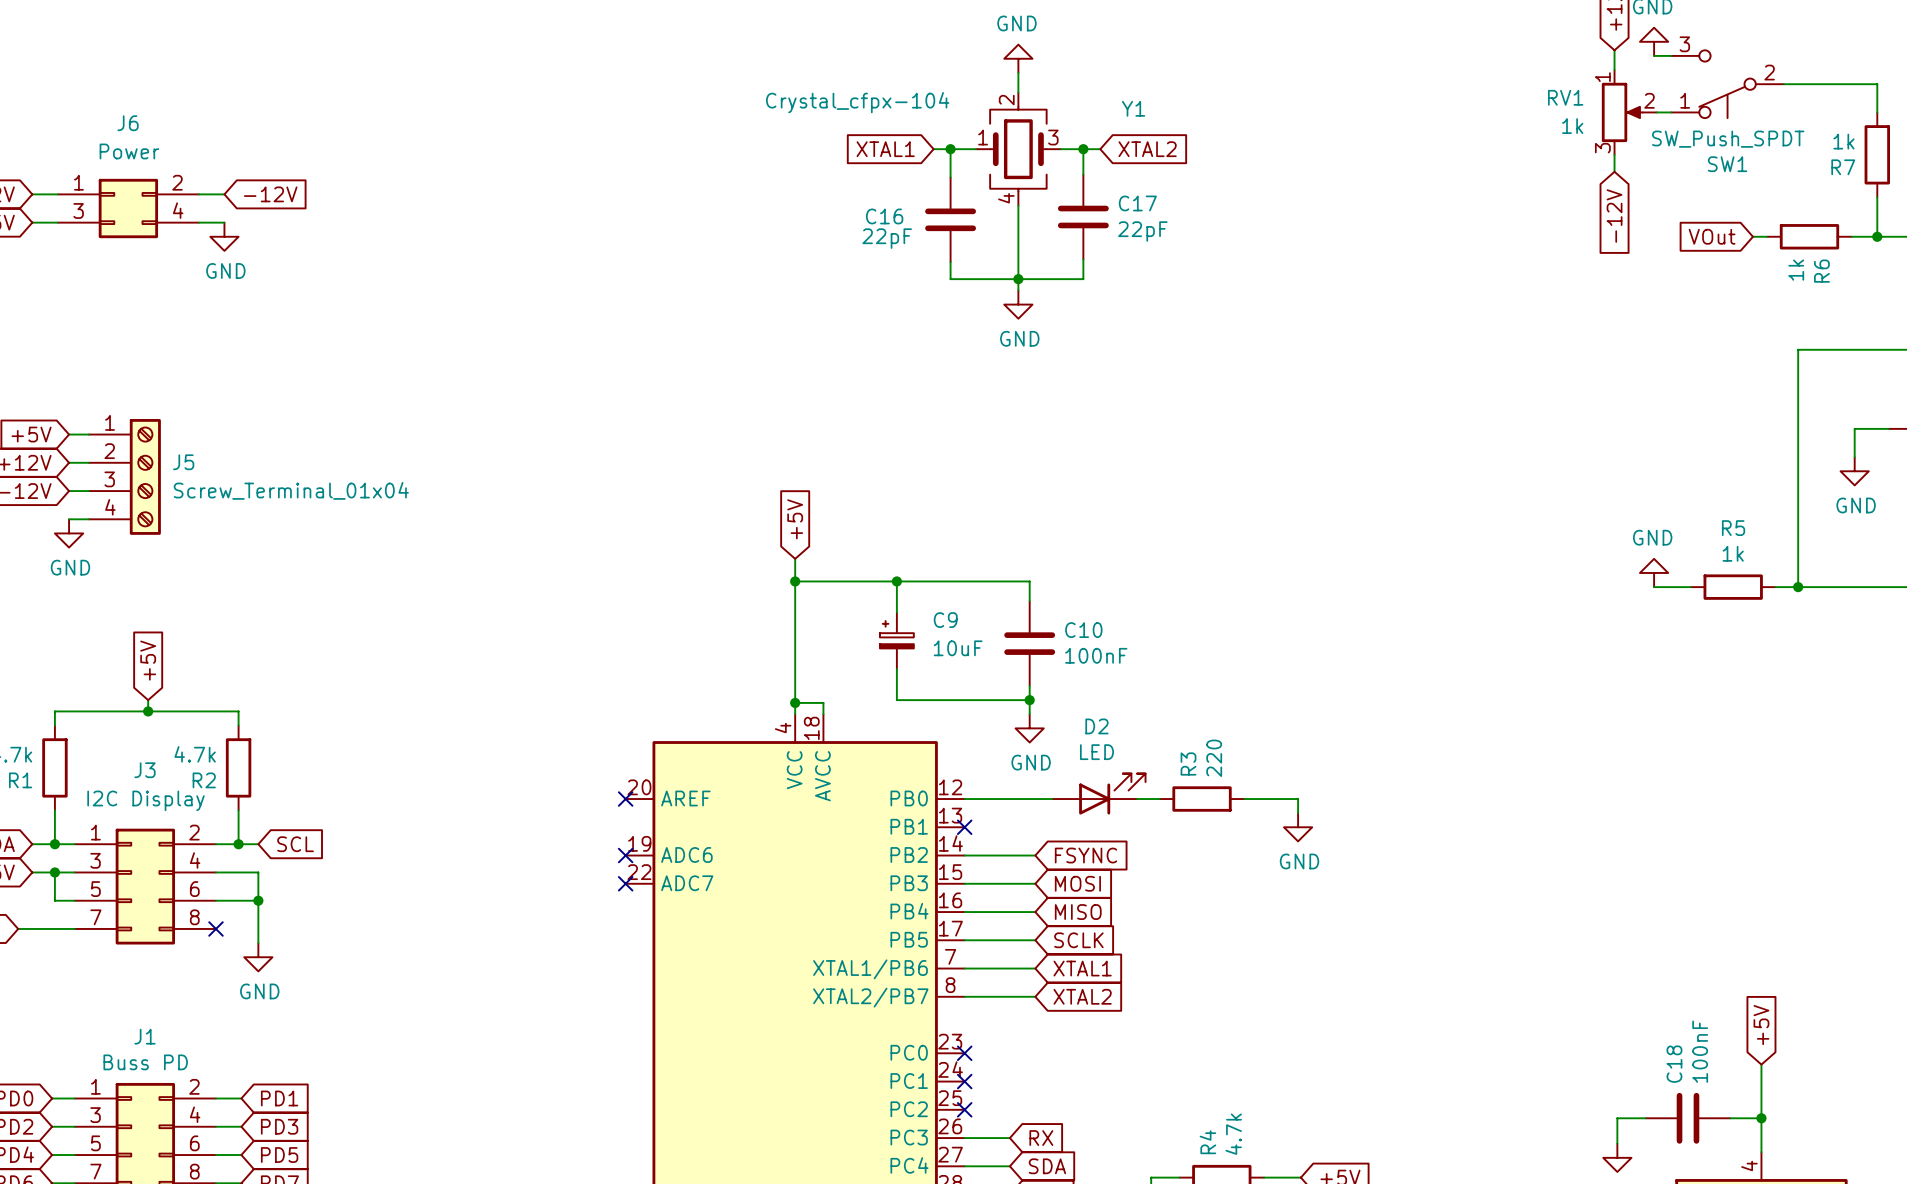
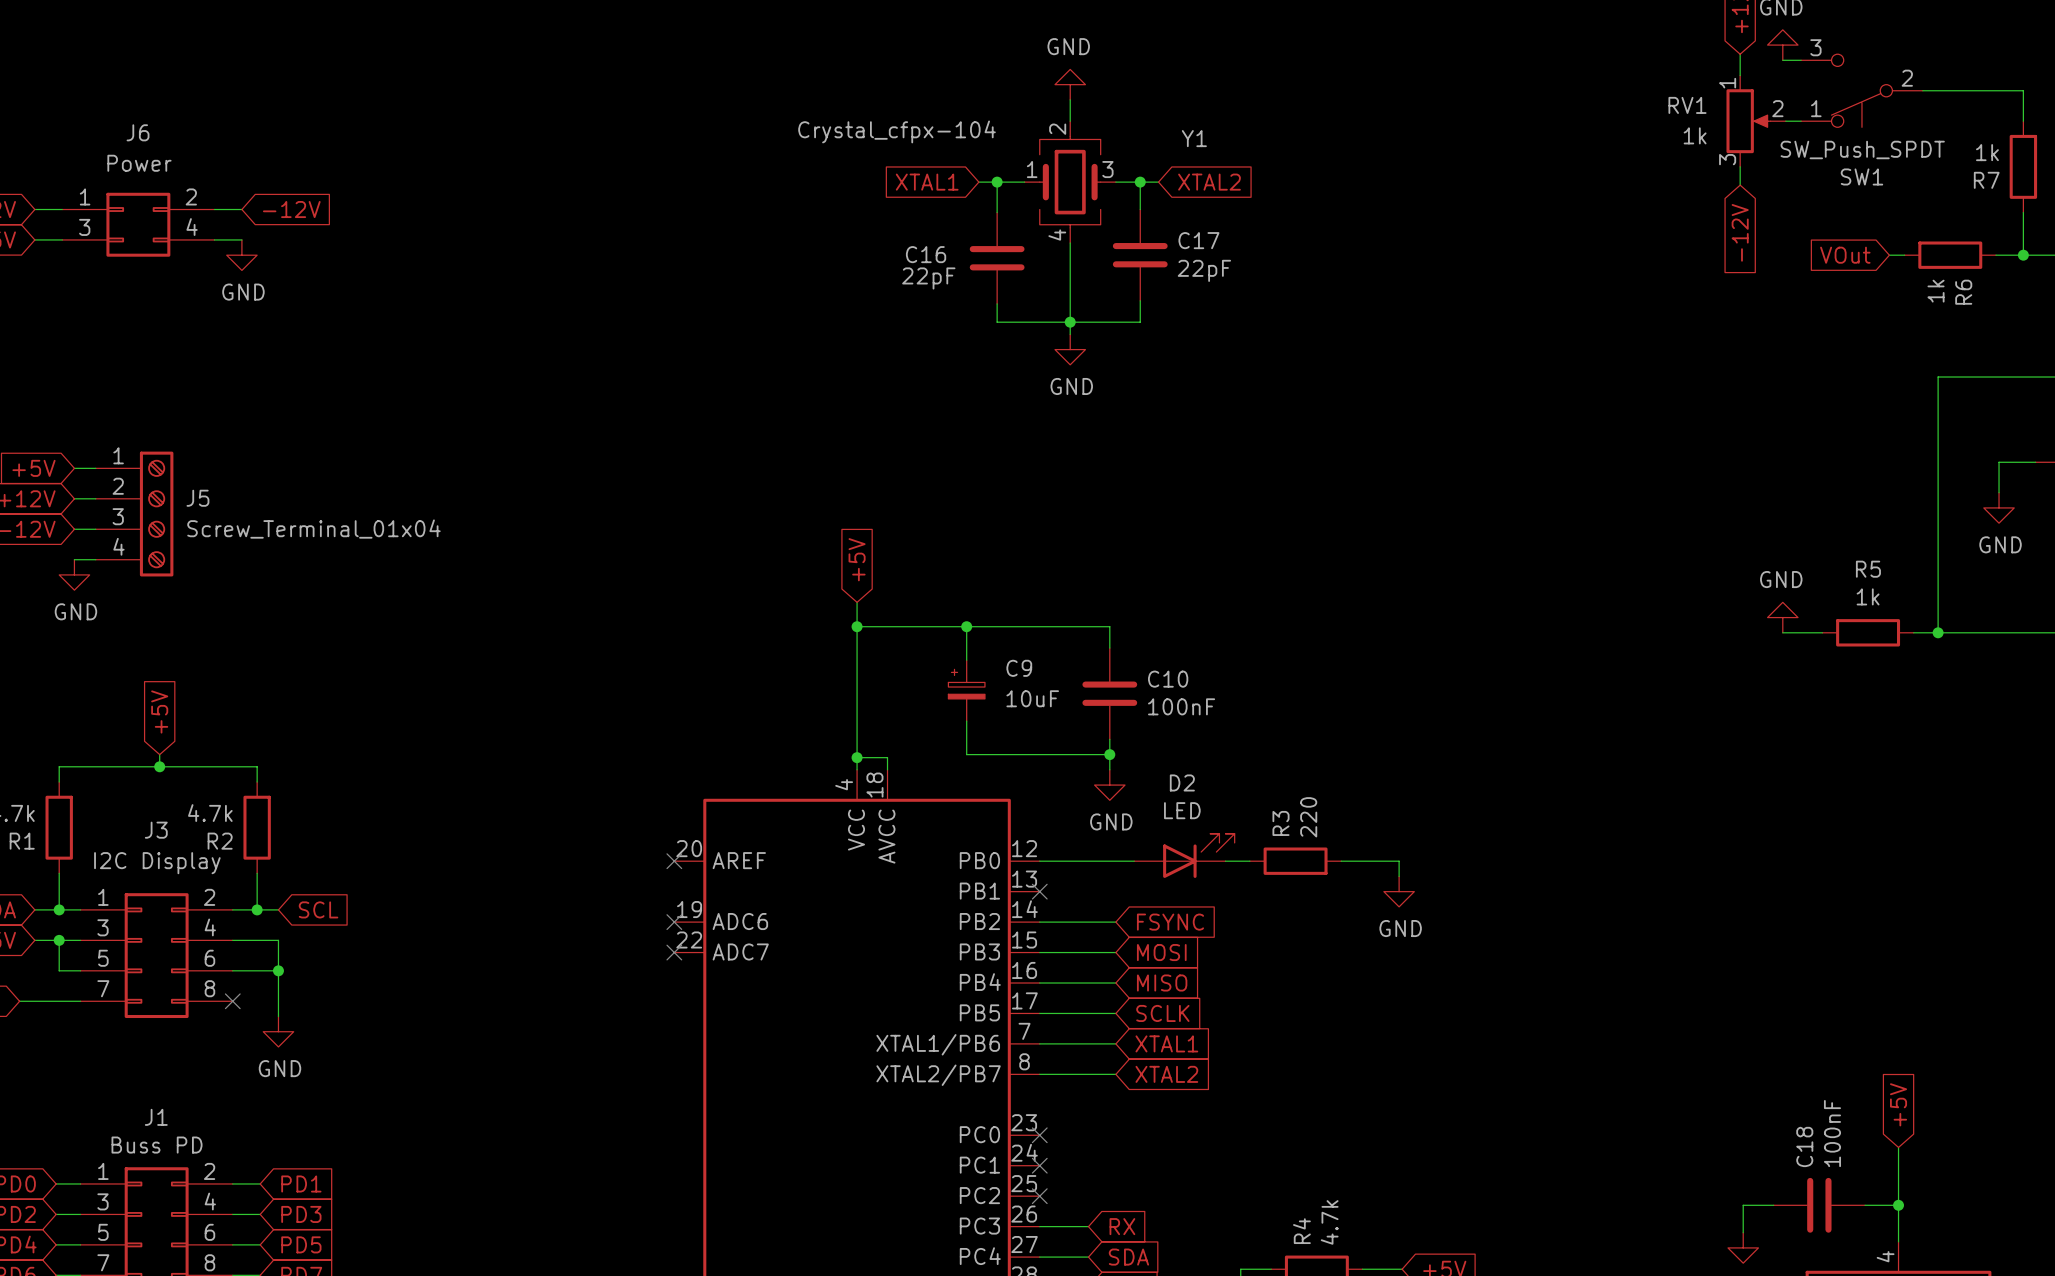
power symbol position: GND (1018, 58) -> GND (1070, 84)
wire: (1018, 72) (1018, 92) -> (1070, 99) (1070, 121)
global label position: XTAL1 (885, 149) -> XTAL1 (927, 182)
wire: (933, 149) (976, 149) -> (978, 182) (1024, 182)
wire: (950, 149) (950, 177) -> (997, 182) (997, 212)
junction position: (950, 149) -> (997, 182)
Y1 position: (1018, 149) -> (1070, 182)
wire: (1060, 149) (1100, 149) -> (1115, 182) (1158, 182)
wire: (1083, 149) (1083, 174) -> (1140, 182) (1140, 209)
junction position: (1083, 149) -> (1140, 182)
global label position: XTAL2 (1147, 149) -> XTAL2 (1209, 182)
wire: (1018, 205) (1018, 290) -> (1070, 243) (1070, 334)
C17 position: (1083, 216) -> (1140, 255)
C16 position: (950, 219) -> (997, 258)
wire: (1083, 259) (1083, 279) (950, 279) (950, 262) -> (1140, 300) (1140, 322) (997, 322) (997, 303)
junction position: (1018, 279) -> (1070, 322)
power symbol position: GND (1018, 304) -> GND (1070, 349)

